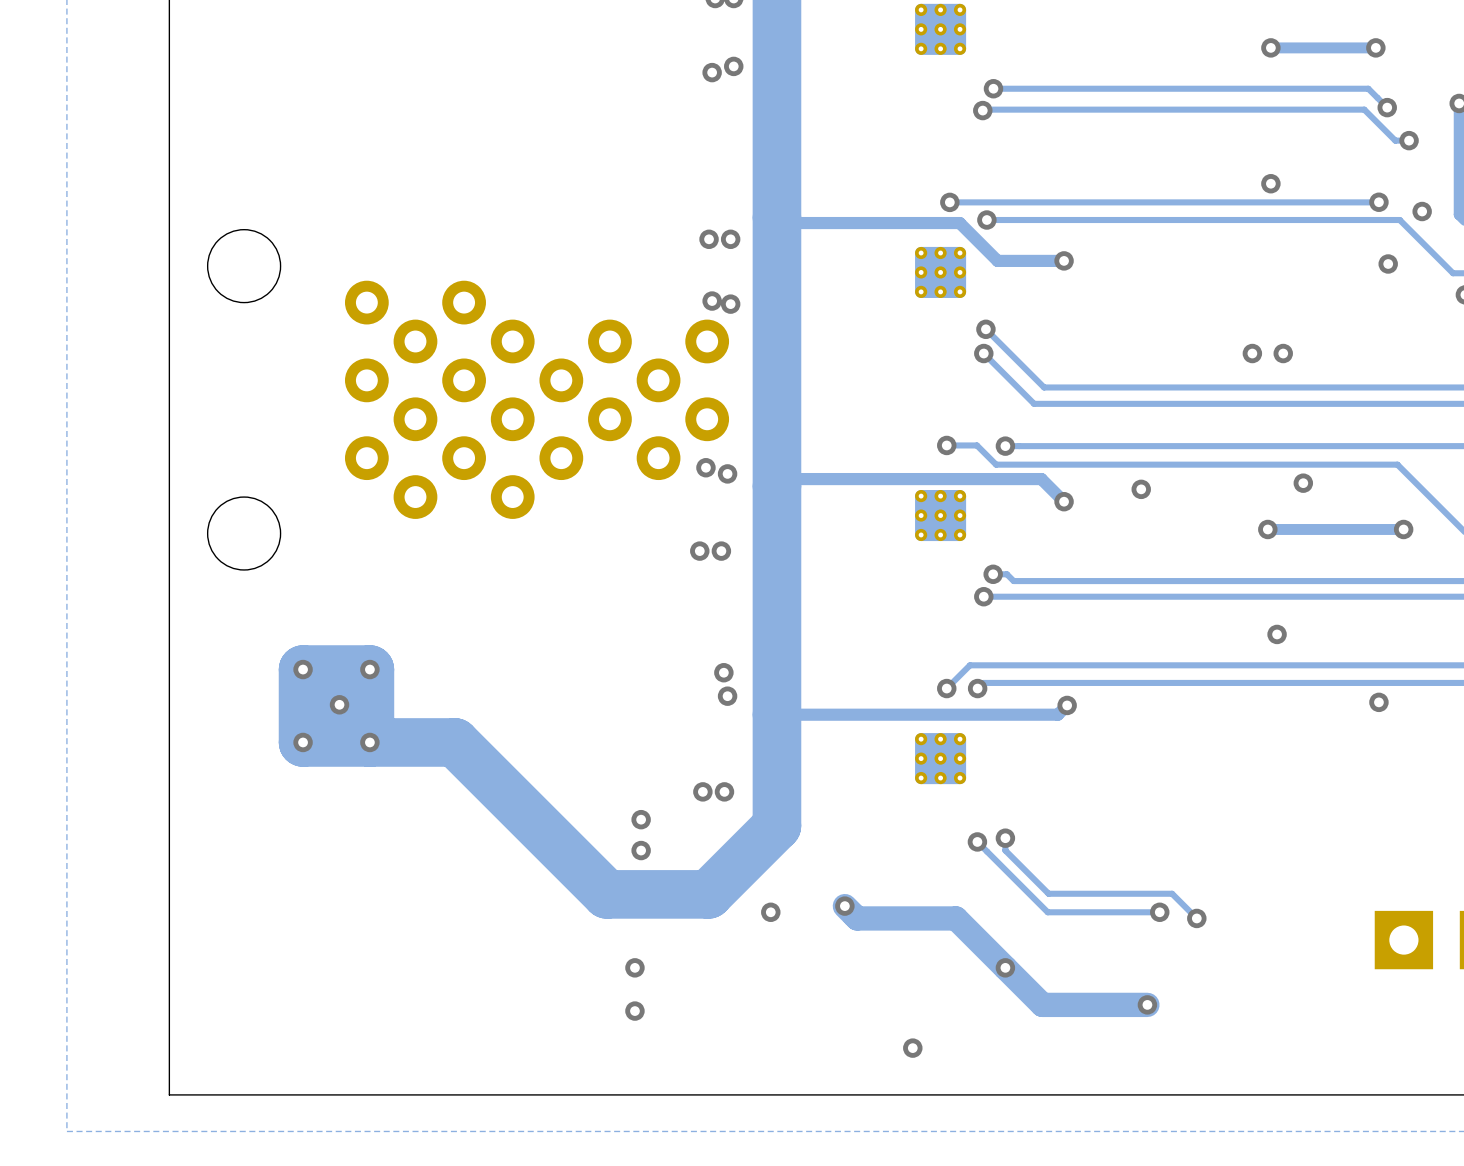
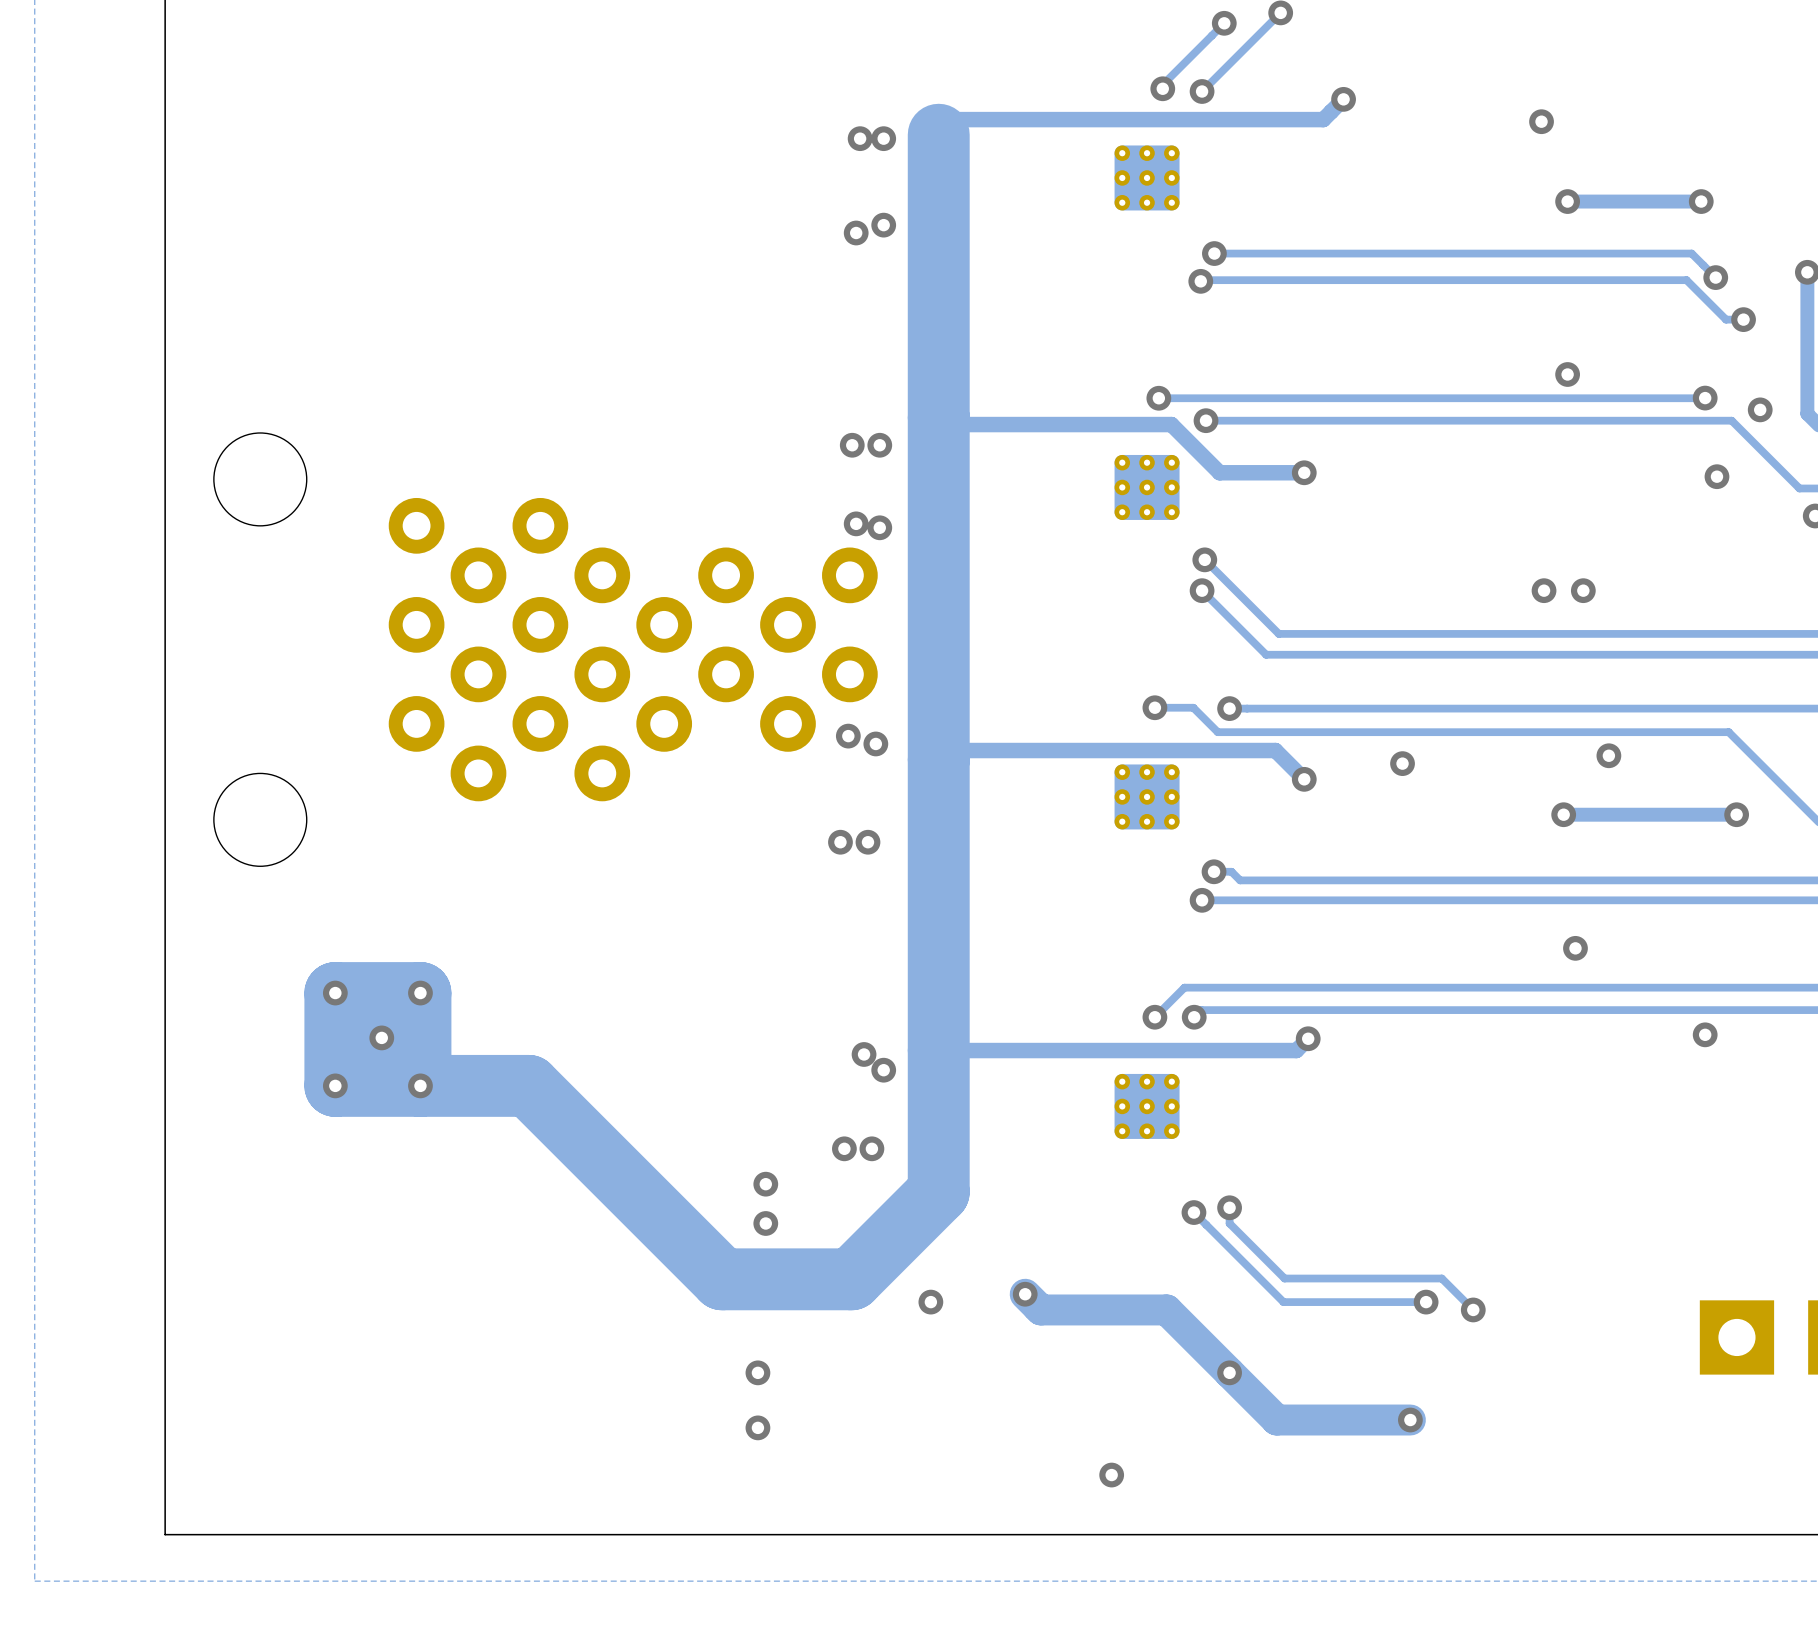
via: (723, 672) -> none
via: (727, 696) -> none
via: none -> (864, 1054)
via: none -> (883, 1070)

